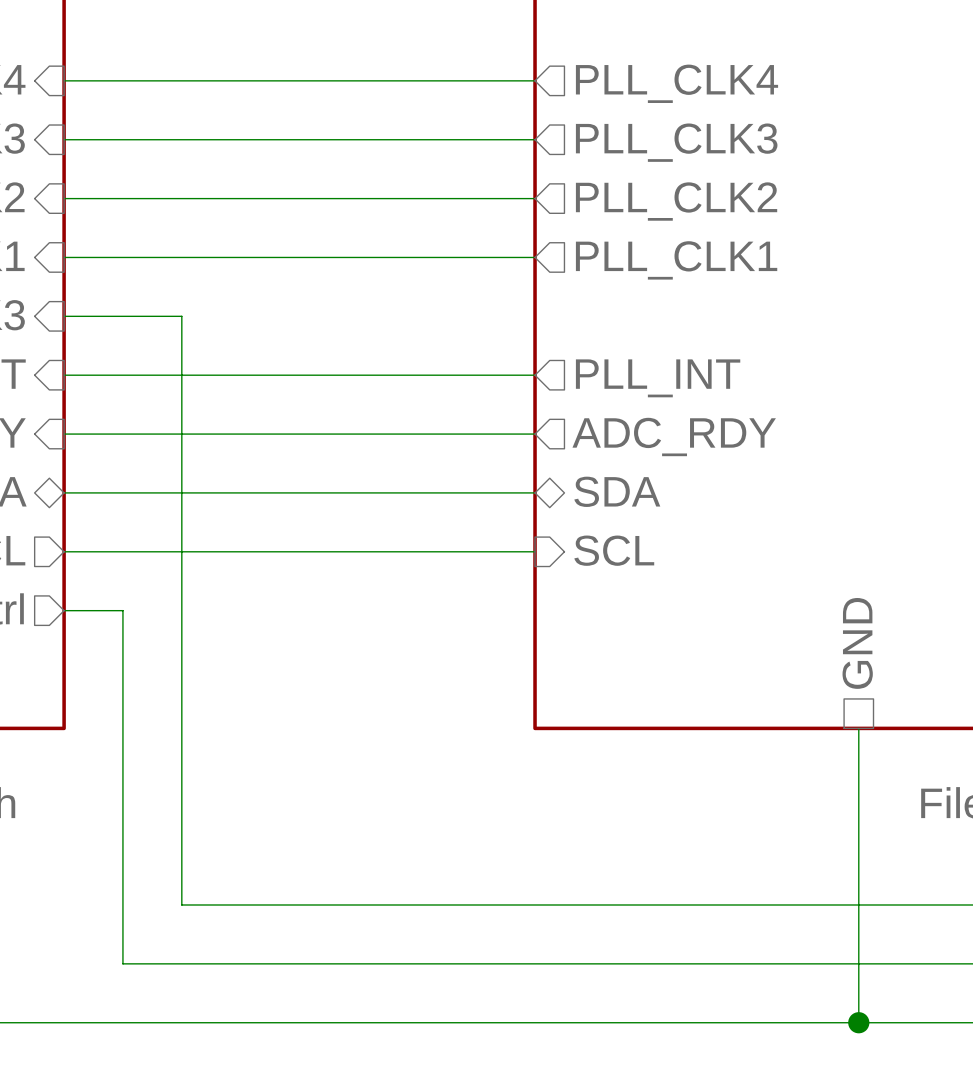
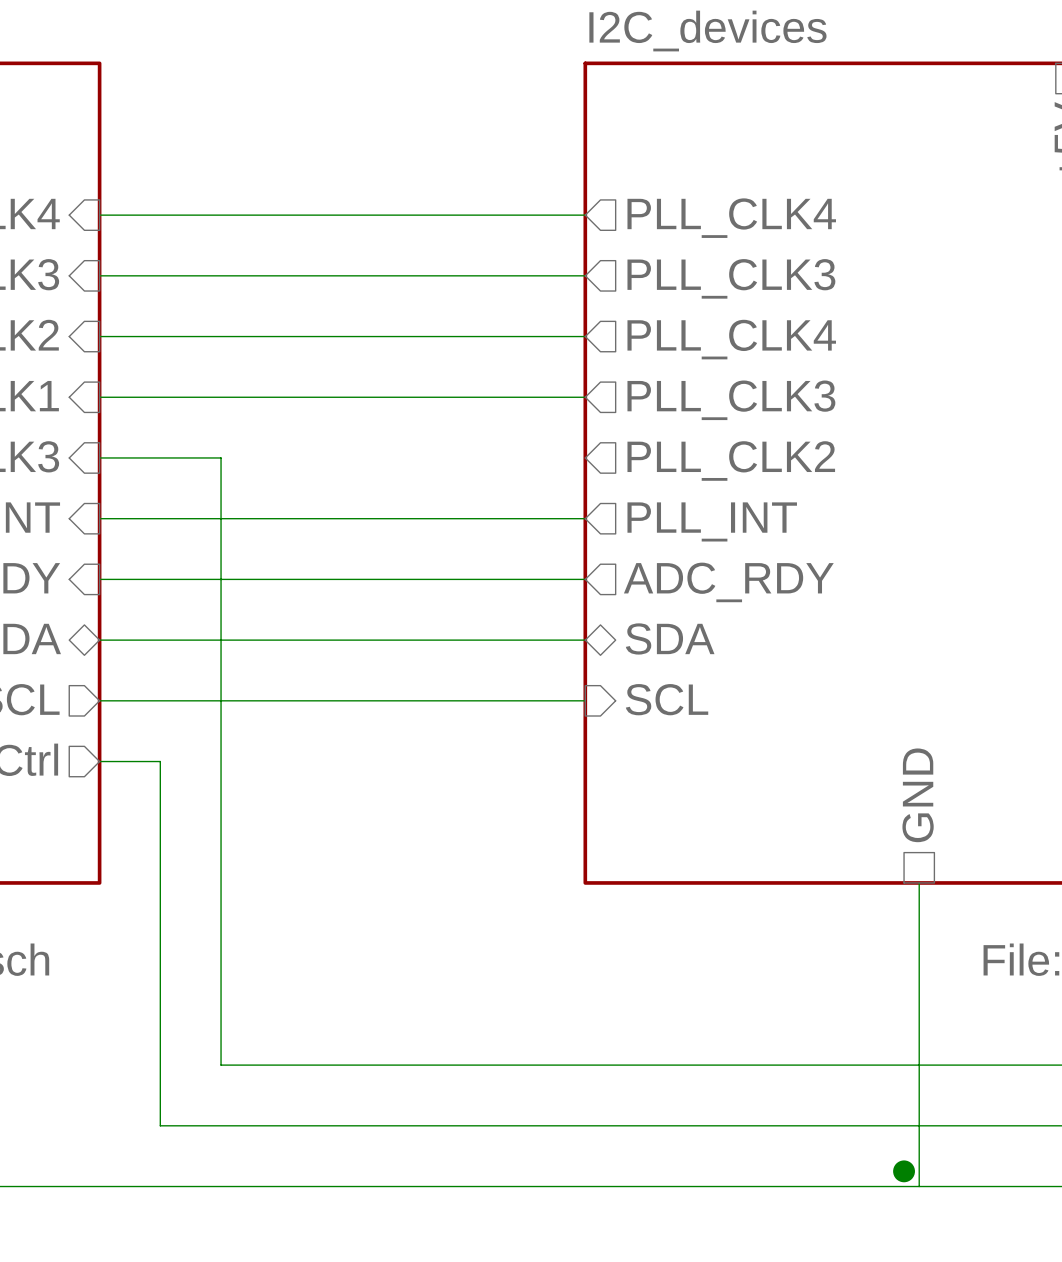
sheet pin: PLL_CLK2 (676, 201) -> PLL_CLK4 (731, 339)
sheet pin: PLL_CLK1 (676, 260) -> PLL_CLK3 (731, 400)
sheet pin: none -> PLL_CLK2 (731, 461)
junction position: (858, 1022) -> (904, 1171)

